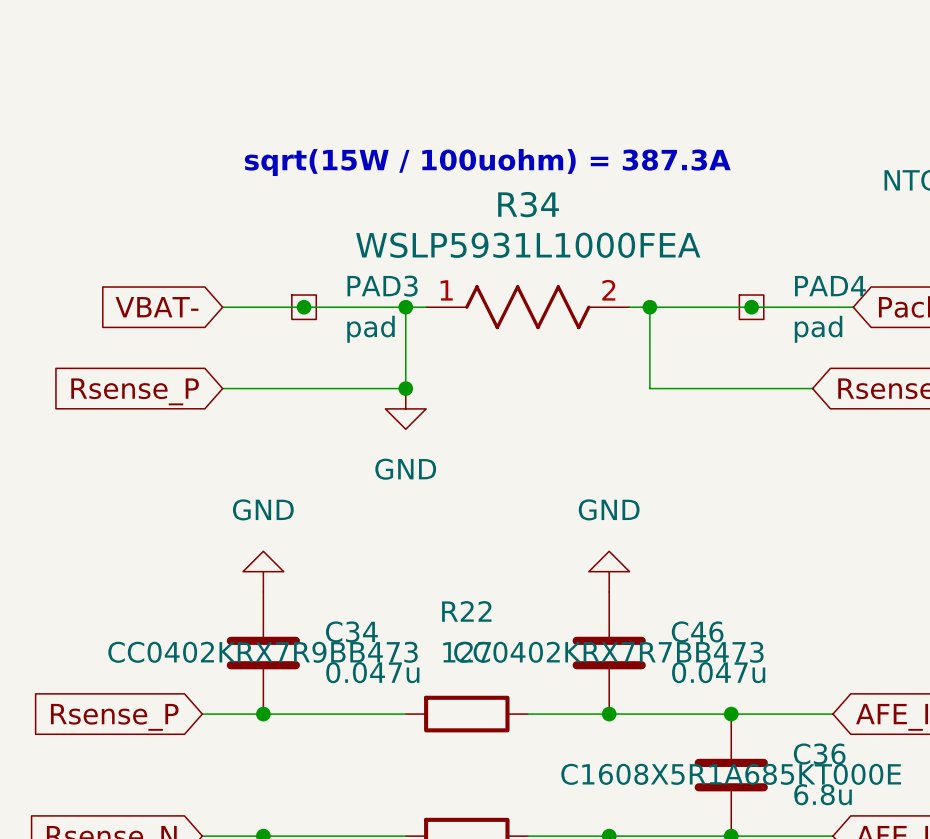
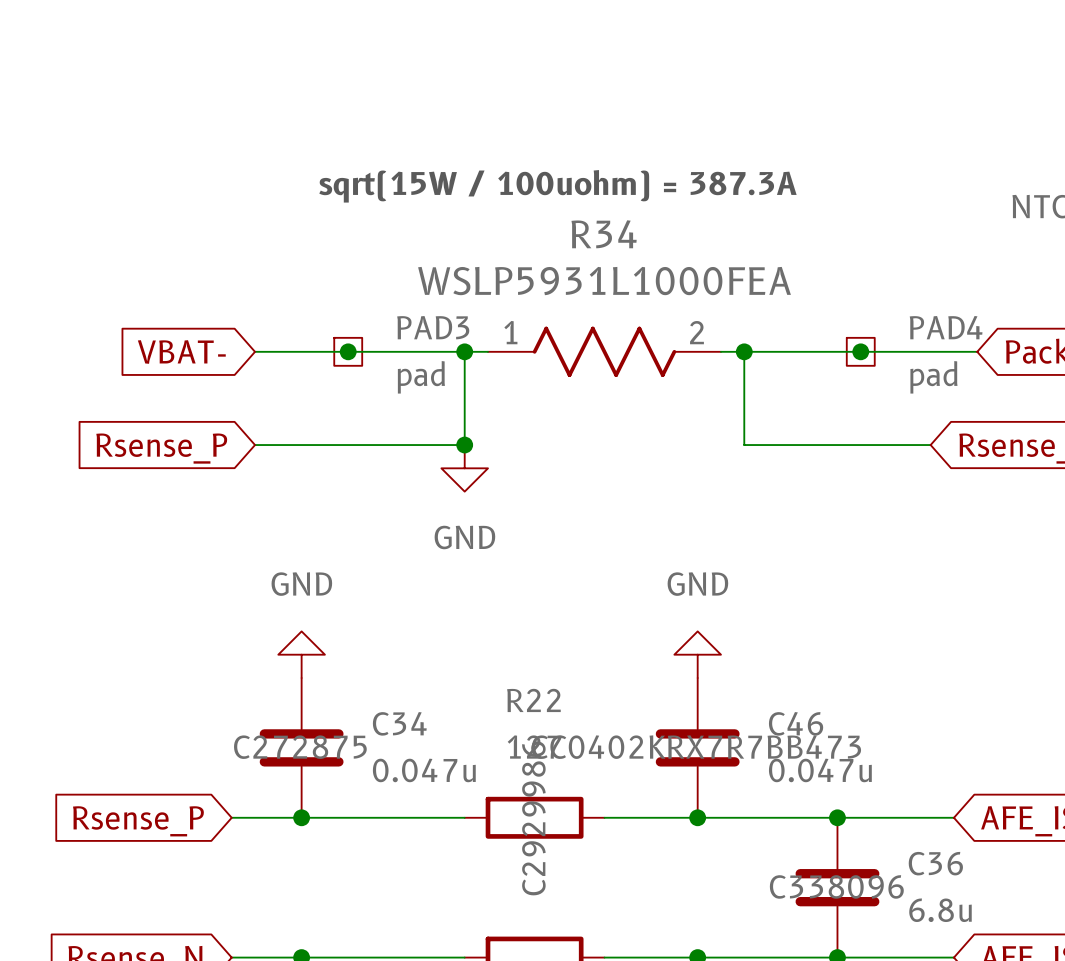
C34 text: CC0402KRX7R9BB473 (263, 652) -> C272875 (300, 747)
R22 text: none -> C2929986 (533, 818)
C36 text: C1608X5R1A685KT000E (731, 774) -> C338096 (836, 886)

